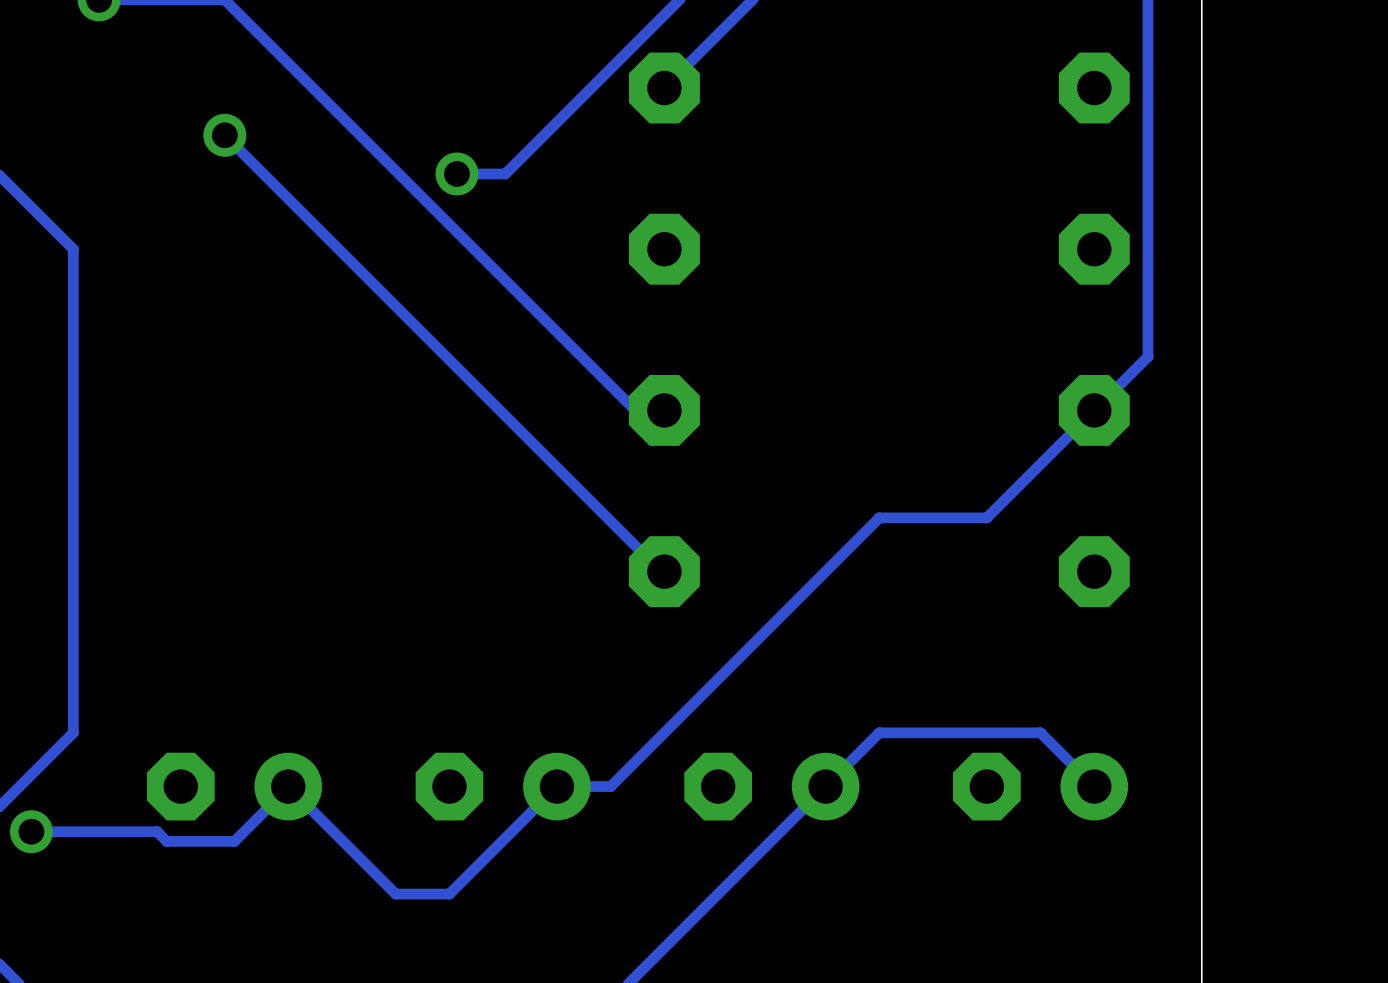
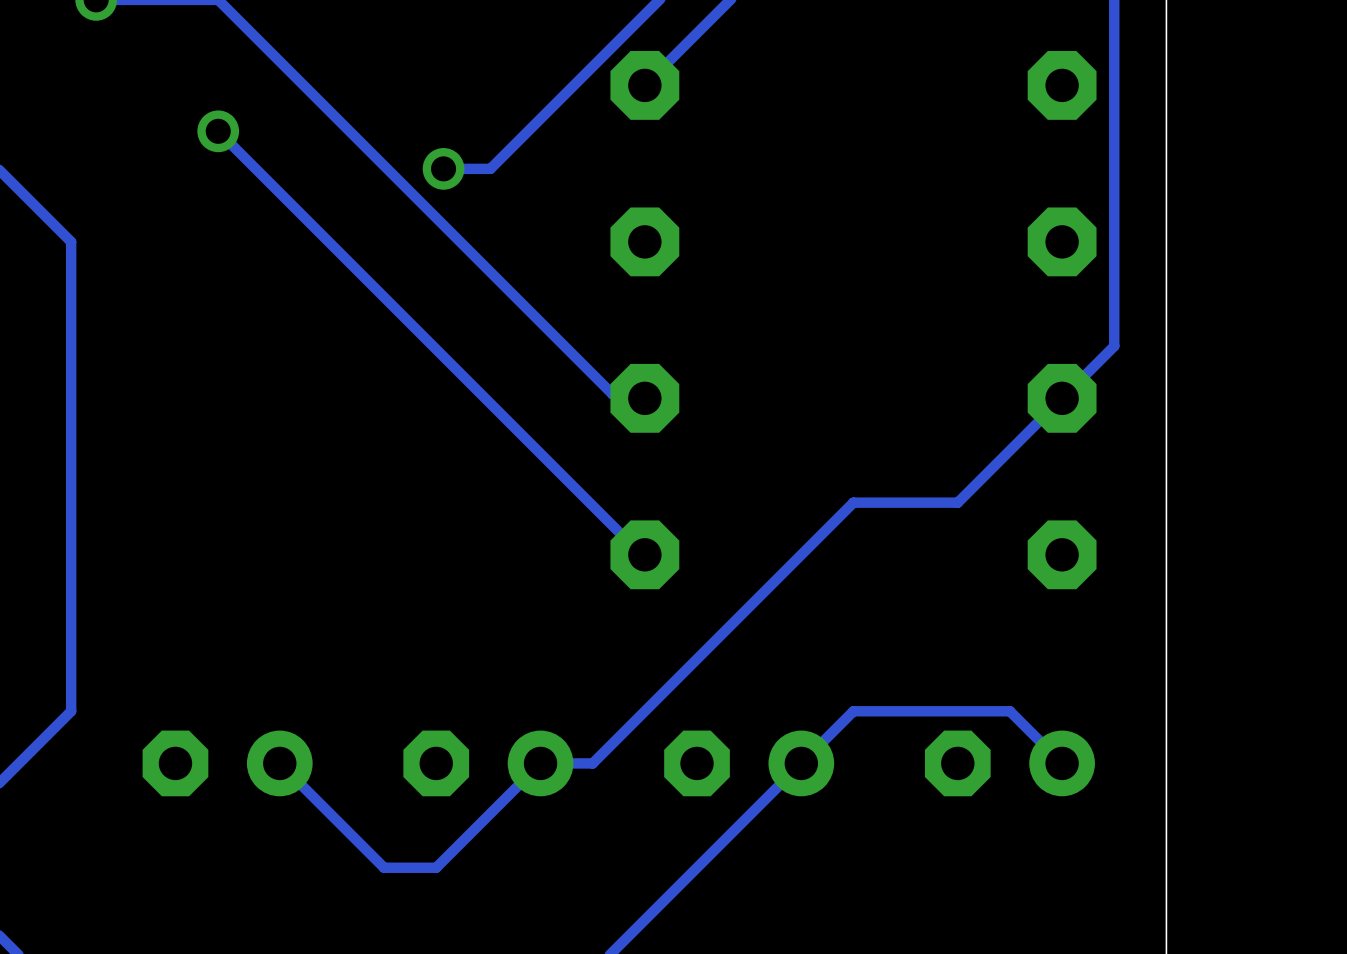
track: (288, 786) (234, 841) (166, 841) (157, 831) (31, 831) -> none
via: (31, 831) -> none

